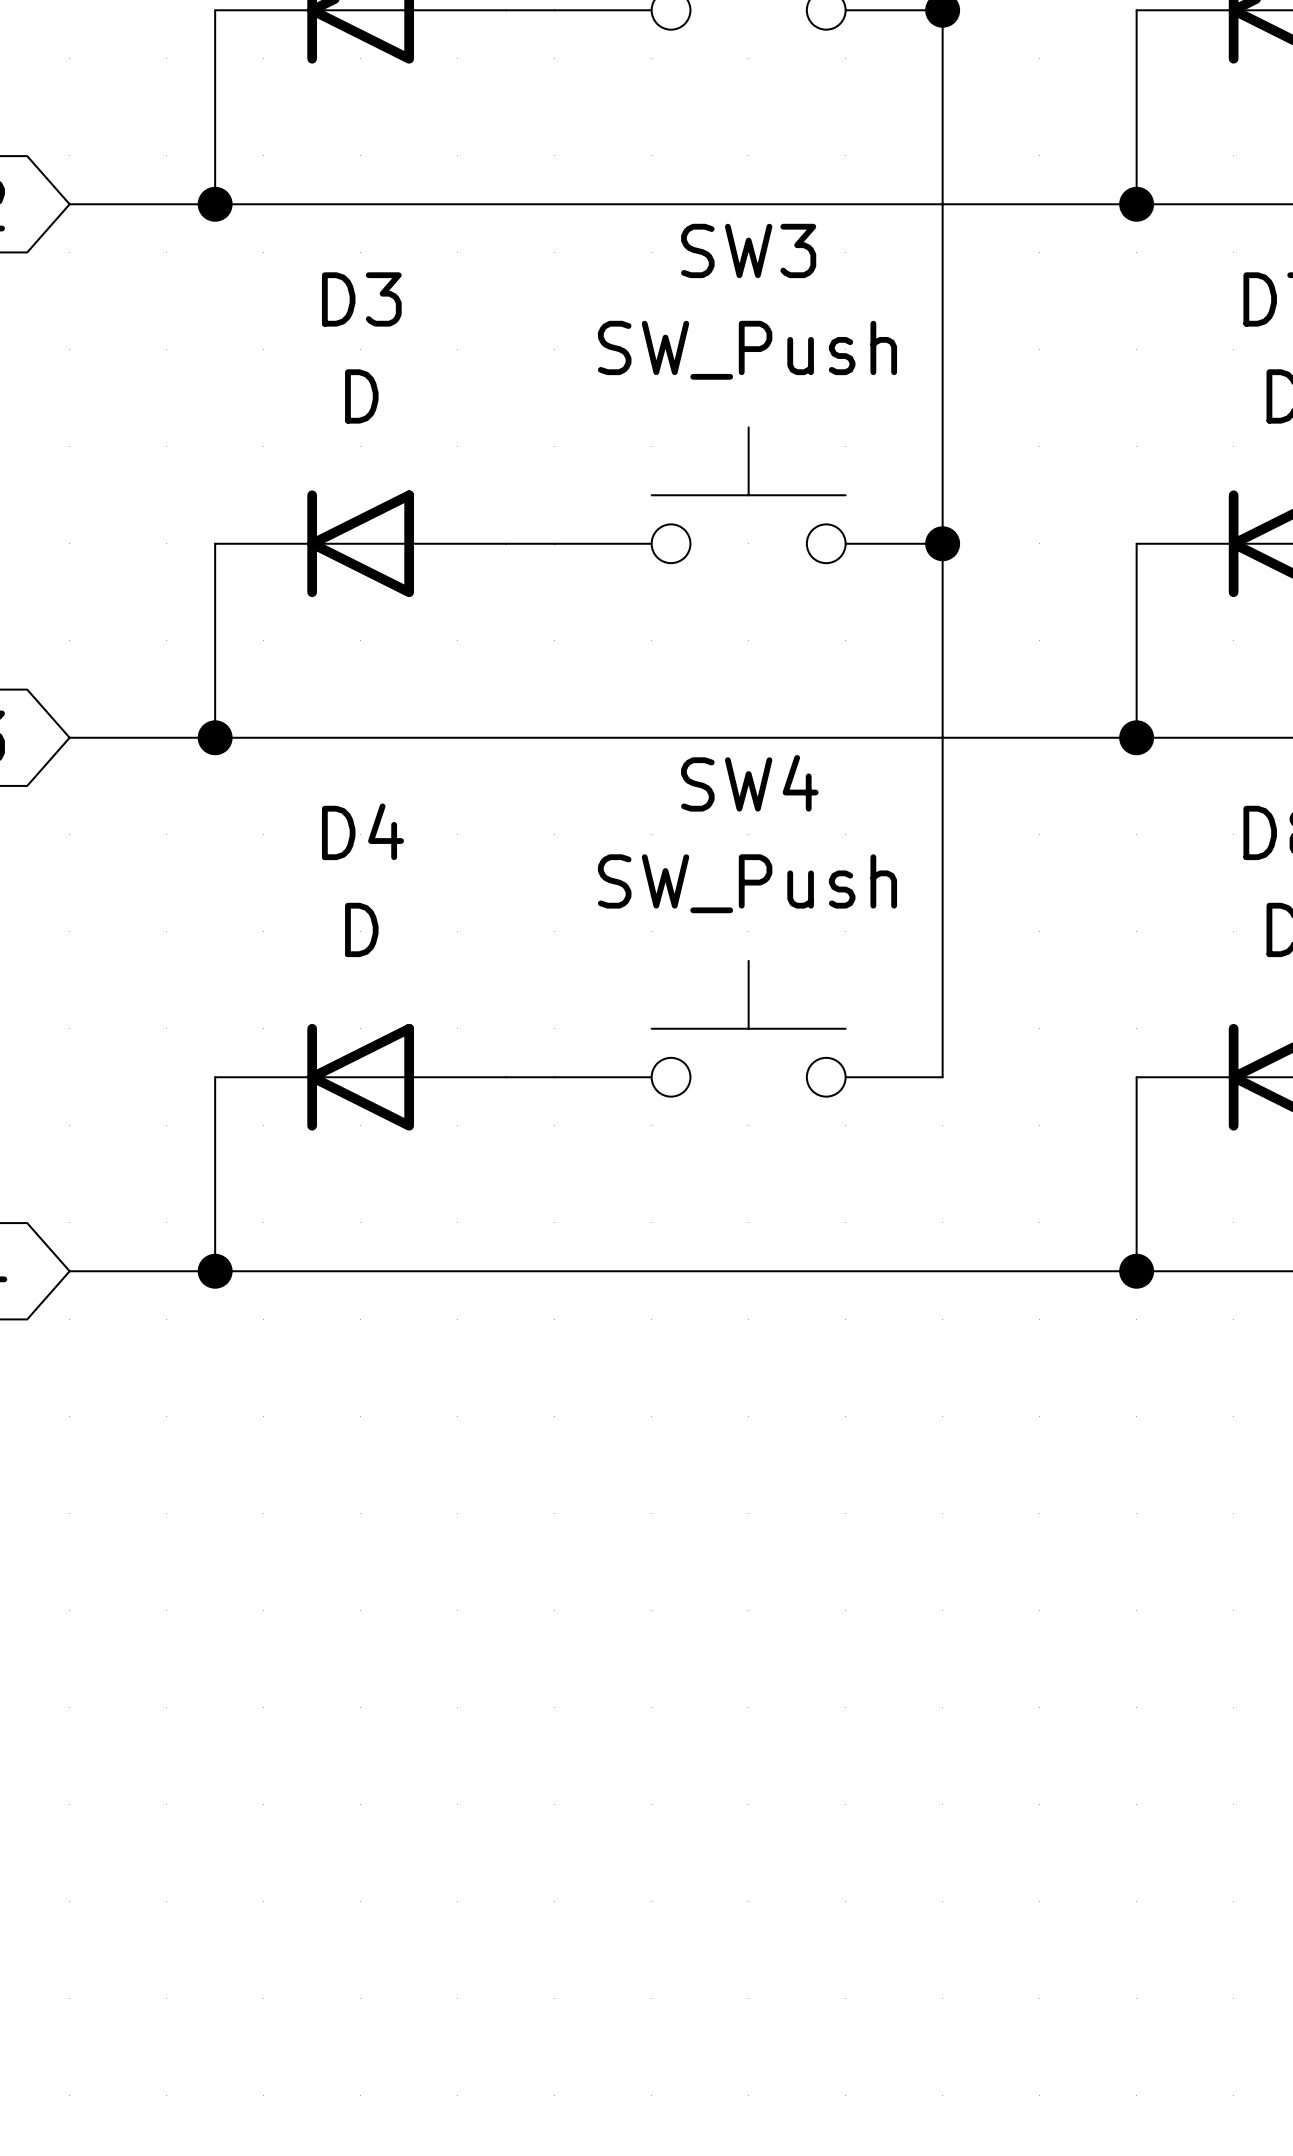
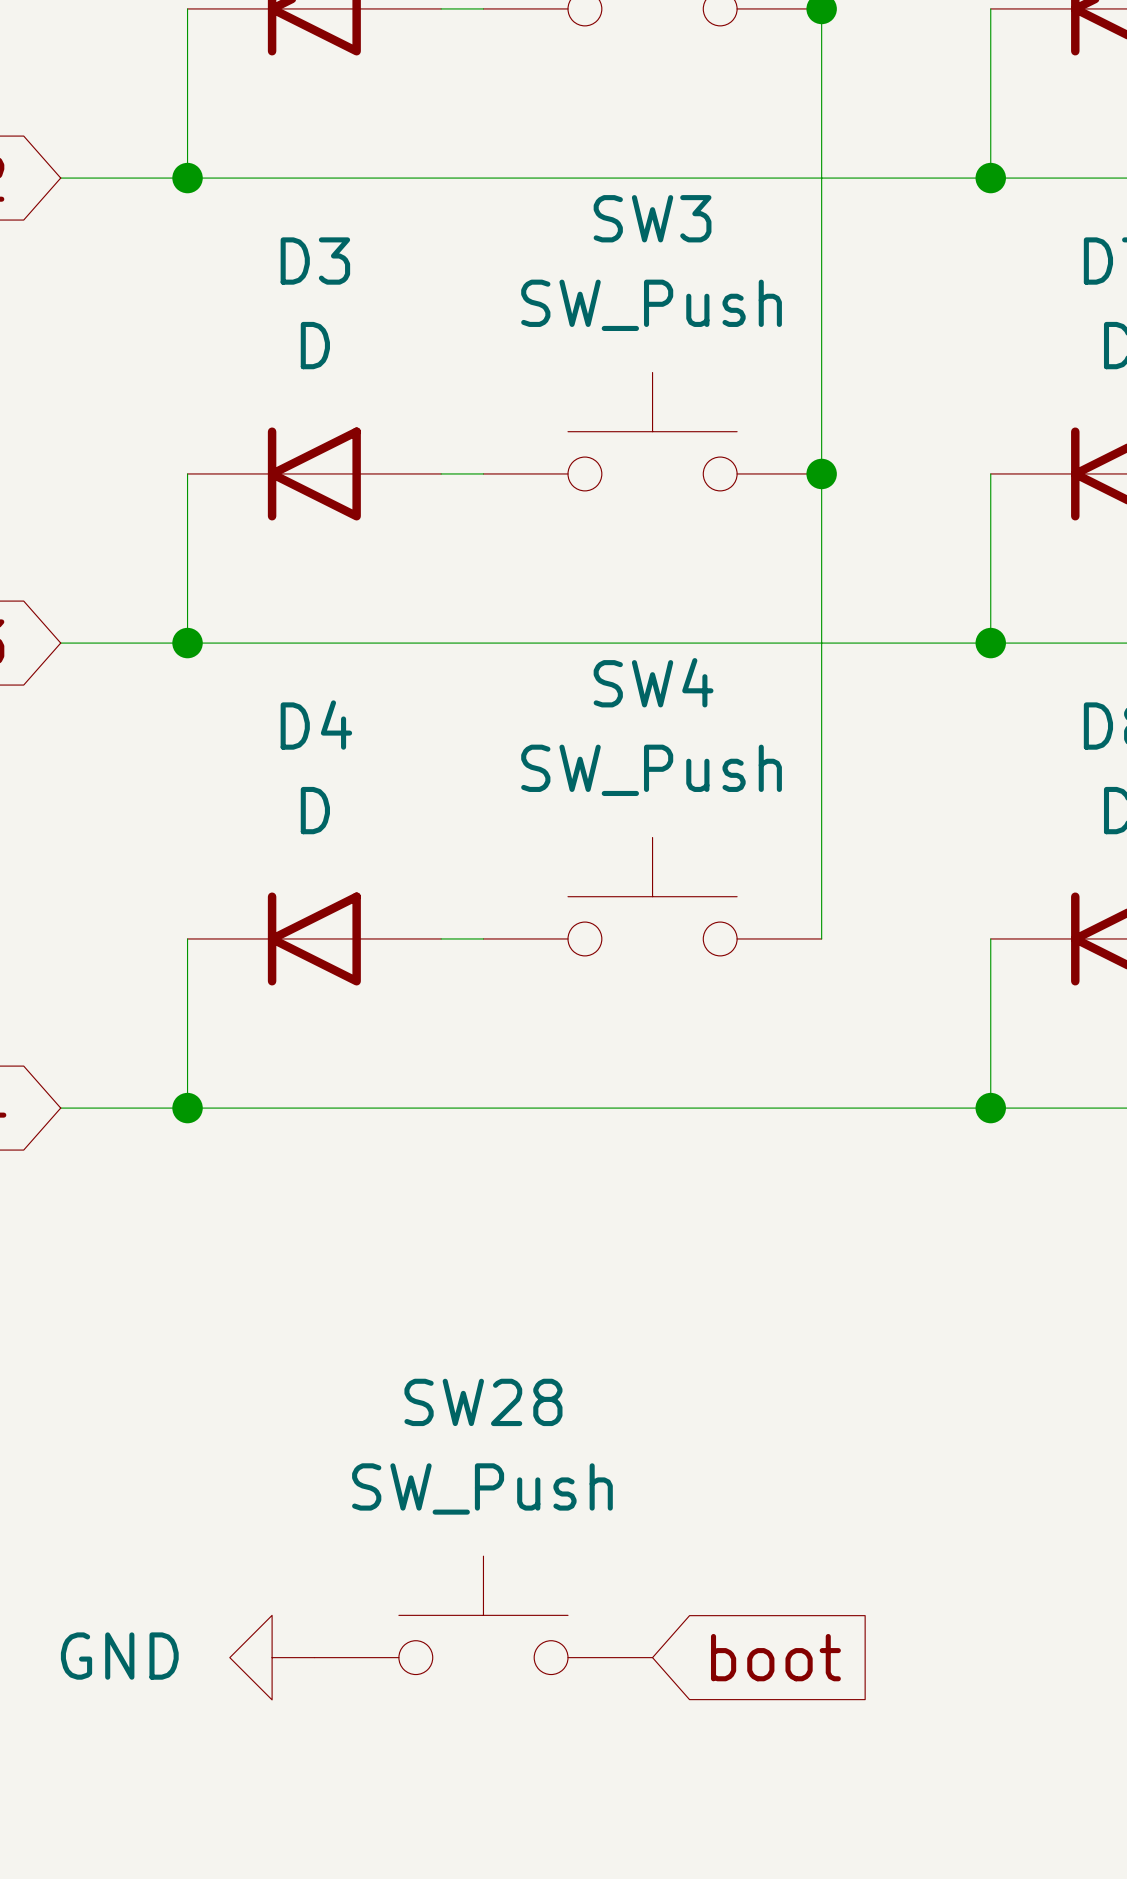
SW28: none -> SW_Push (483, 1615)
power symbol: none -> GND (272, 1657)
global label: none -> boot (775, 1657)

